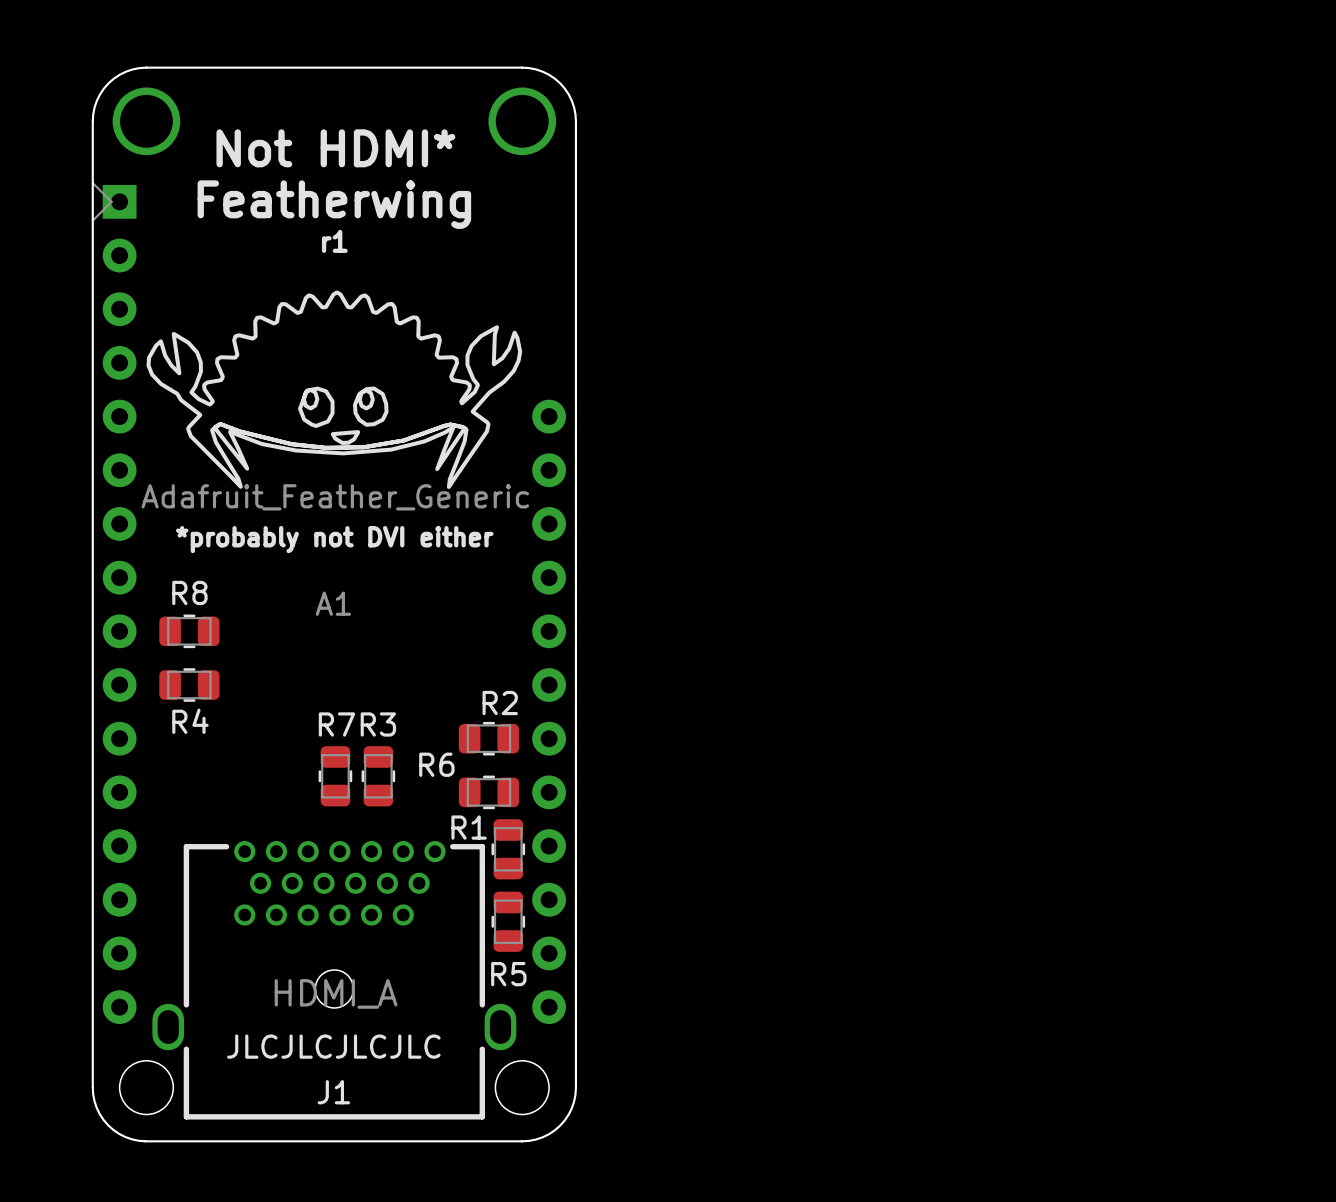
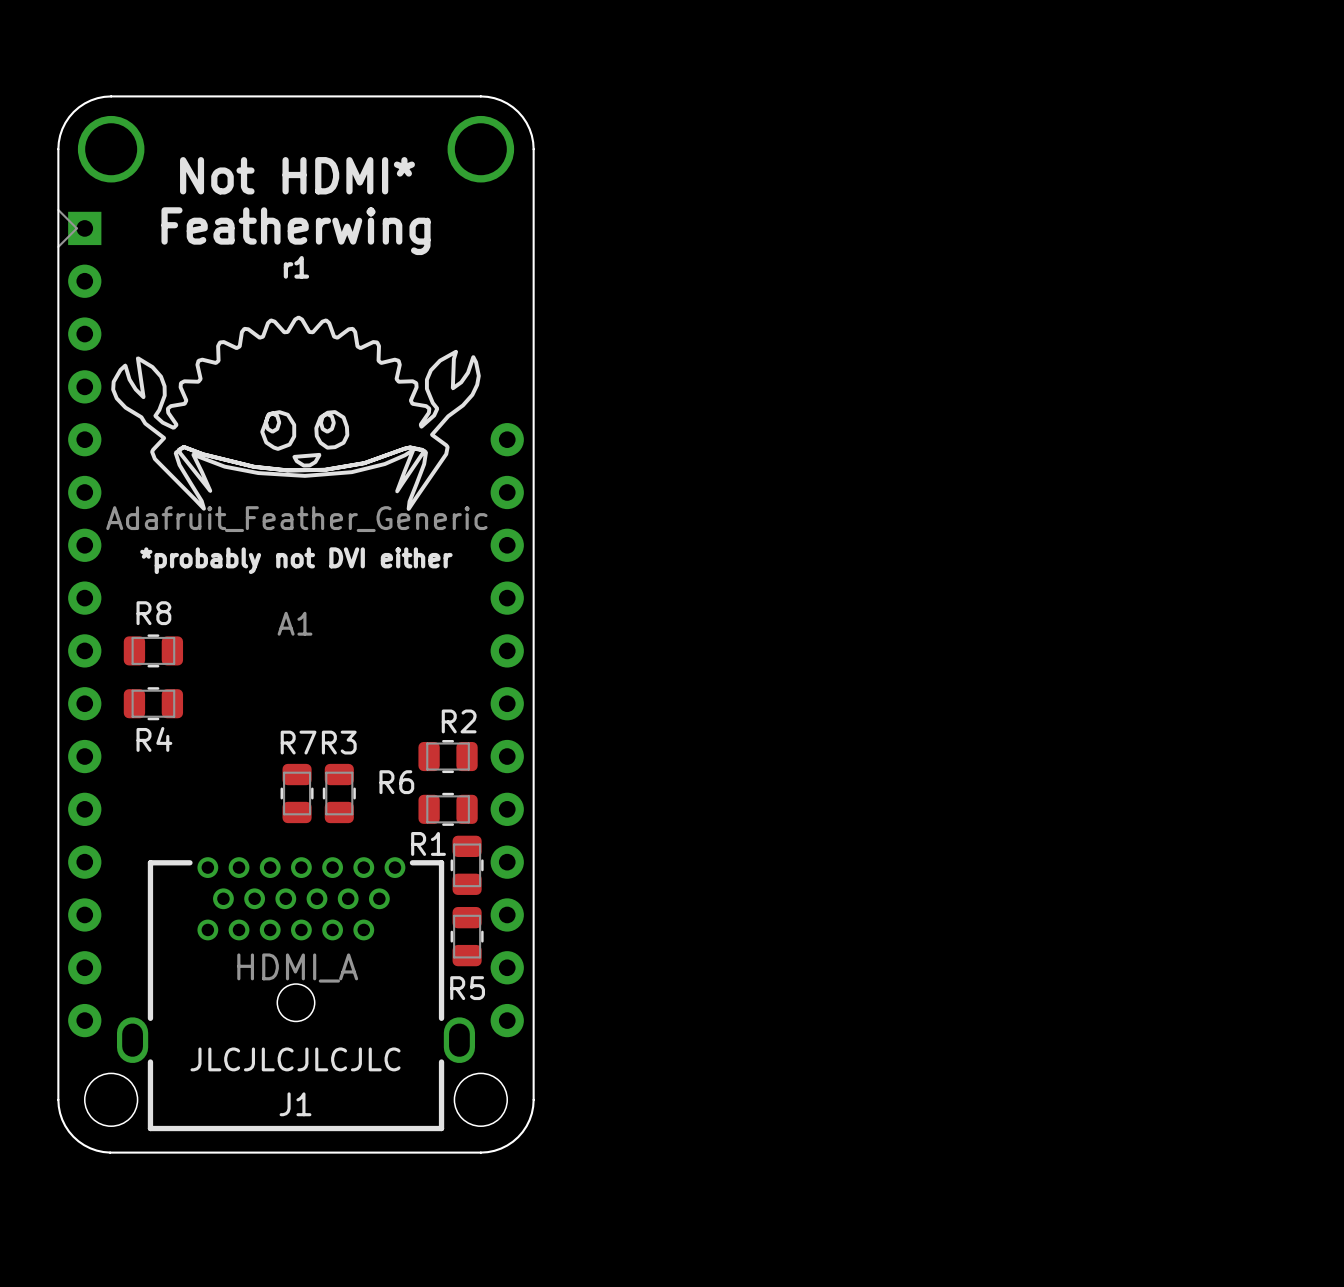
J1 value position: HDMI_A (336, 993) -> HDMI_A (297, 968)

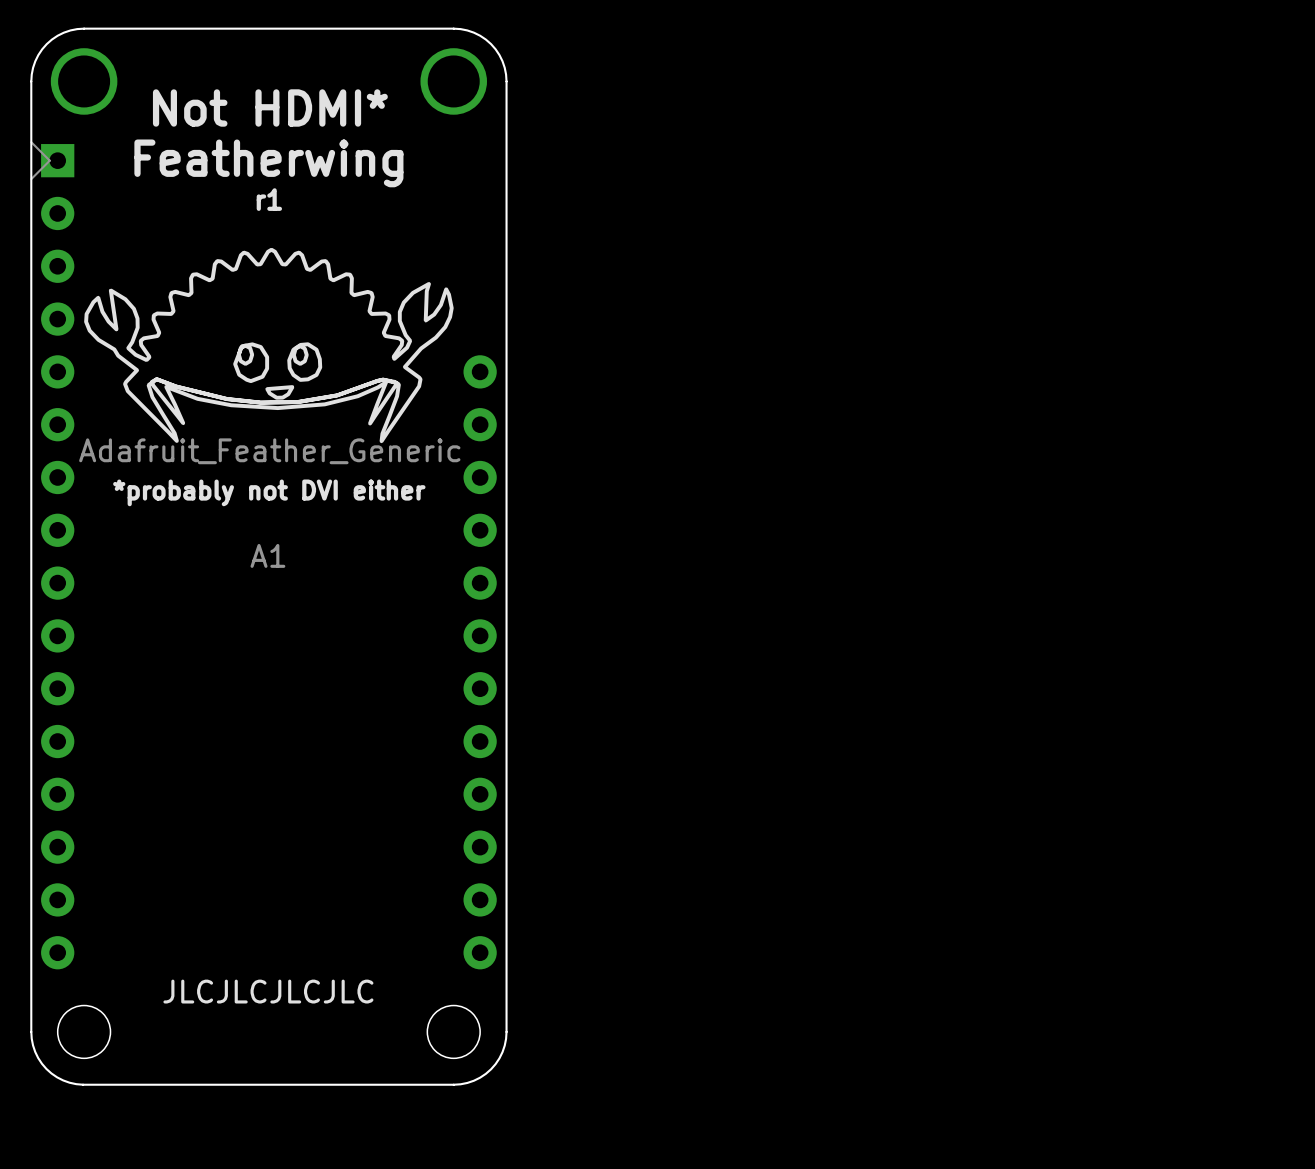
R8: (153, 650) -> none
R4: (153, 703) -> none
R2: (448, 756) -> none
R7: (297, 793) -> none
R3: (339, 793) -> none
R6: (448, 809) -> none
R1: (467, 865) -> none
R5: (467, 936) -> none
J1: HDMI_A (296, 994) -> none

